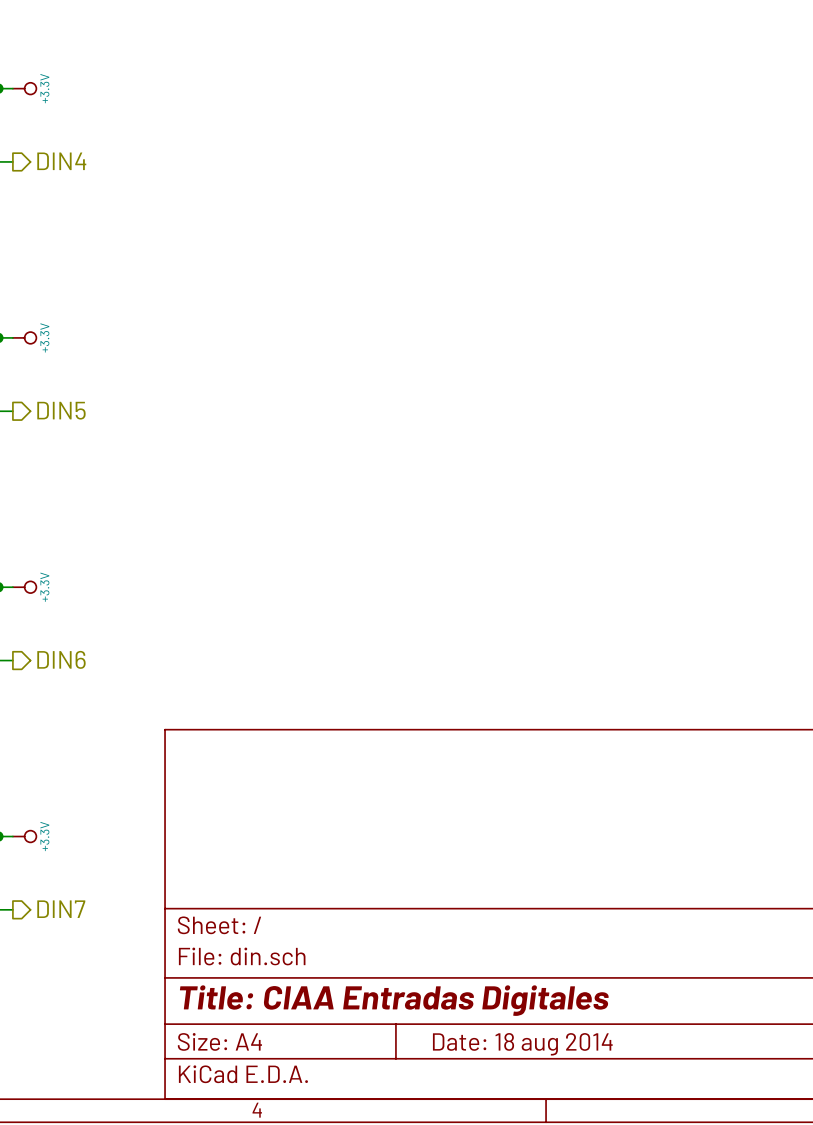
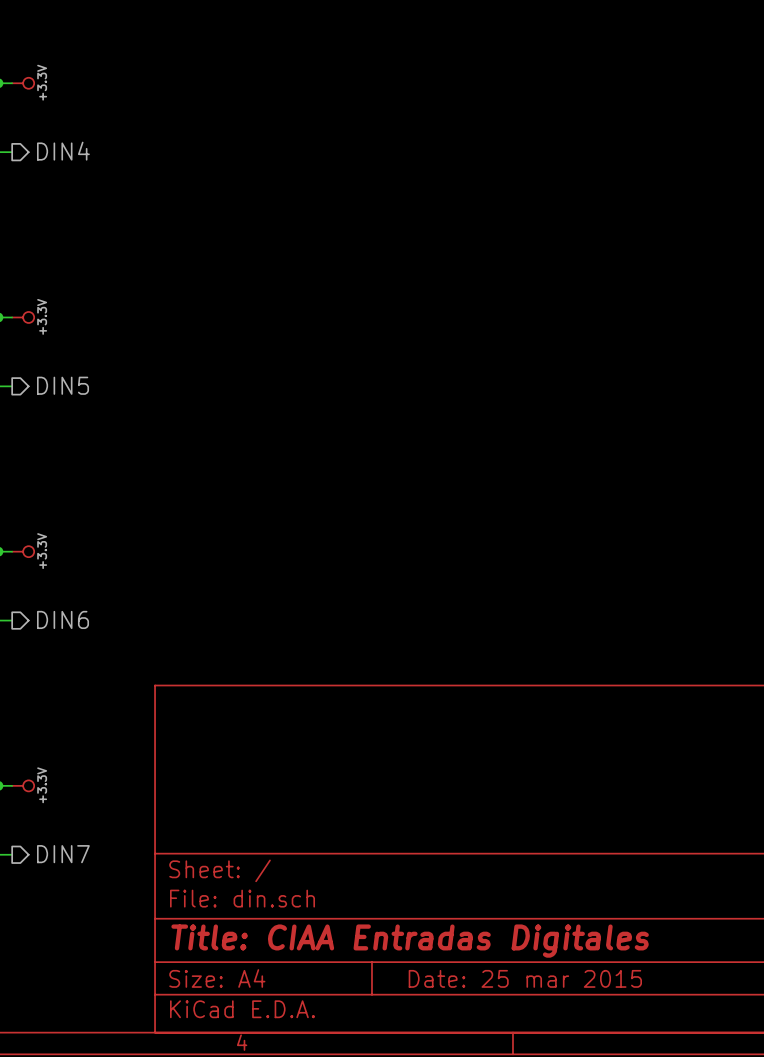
title block: Date: 18 aug 2014 (522, 1044) -> Date: 25 mar 2015 (525, 978)

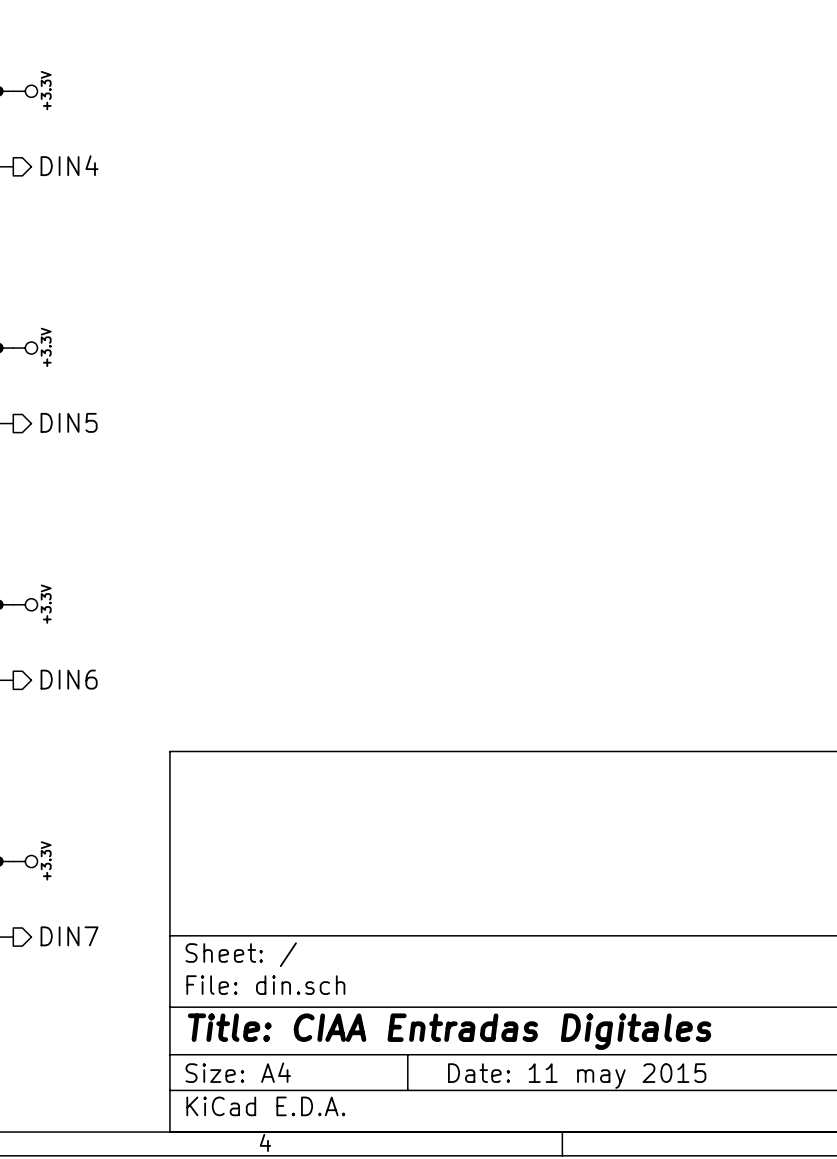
title block: Date: 25 mar 2015 (525, 978) -> Date: 11 may 2015 (577, 1076)

